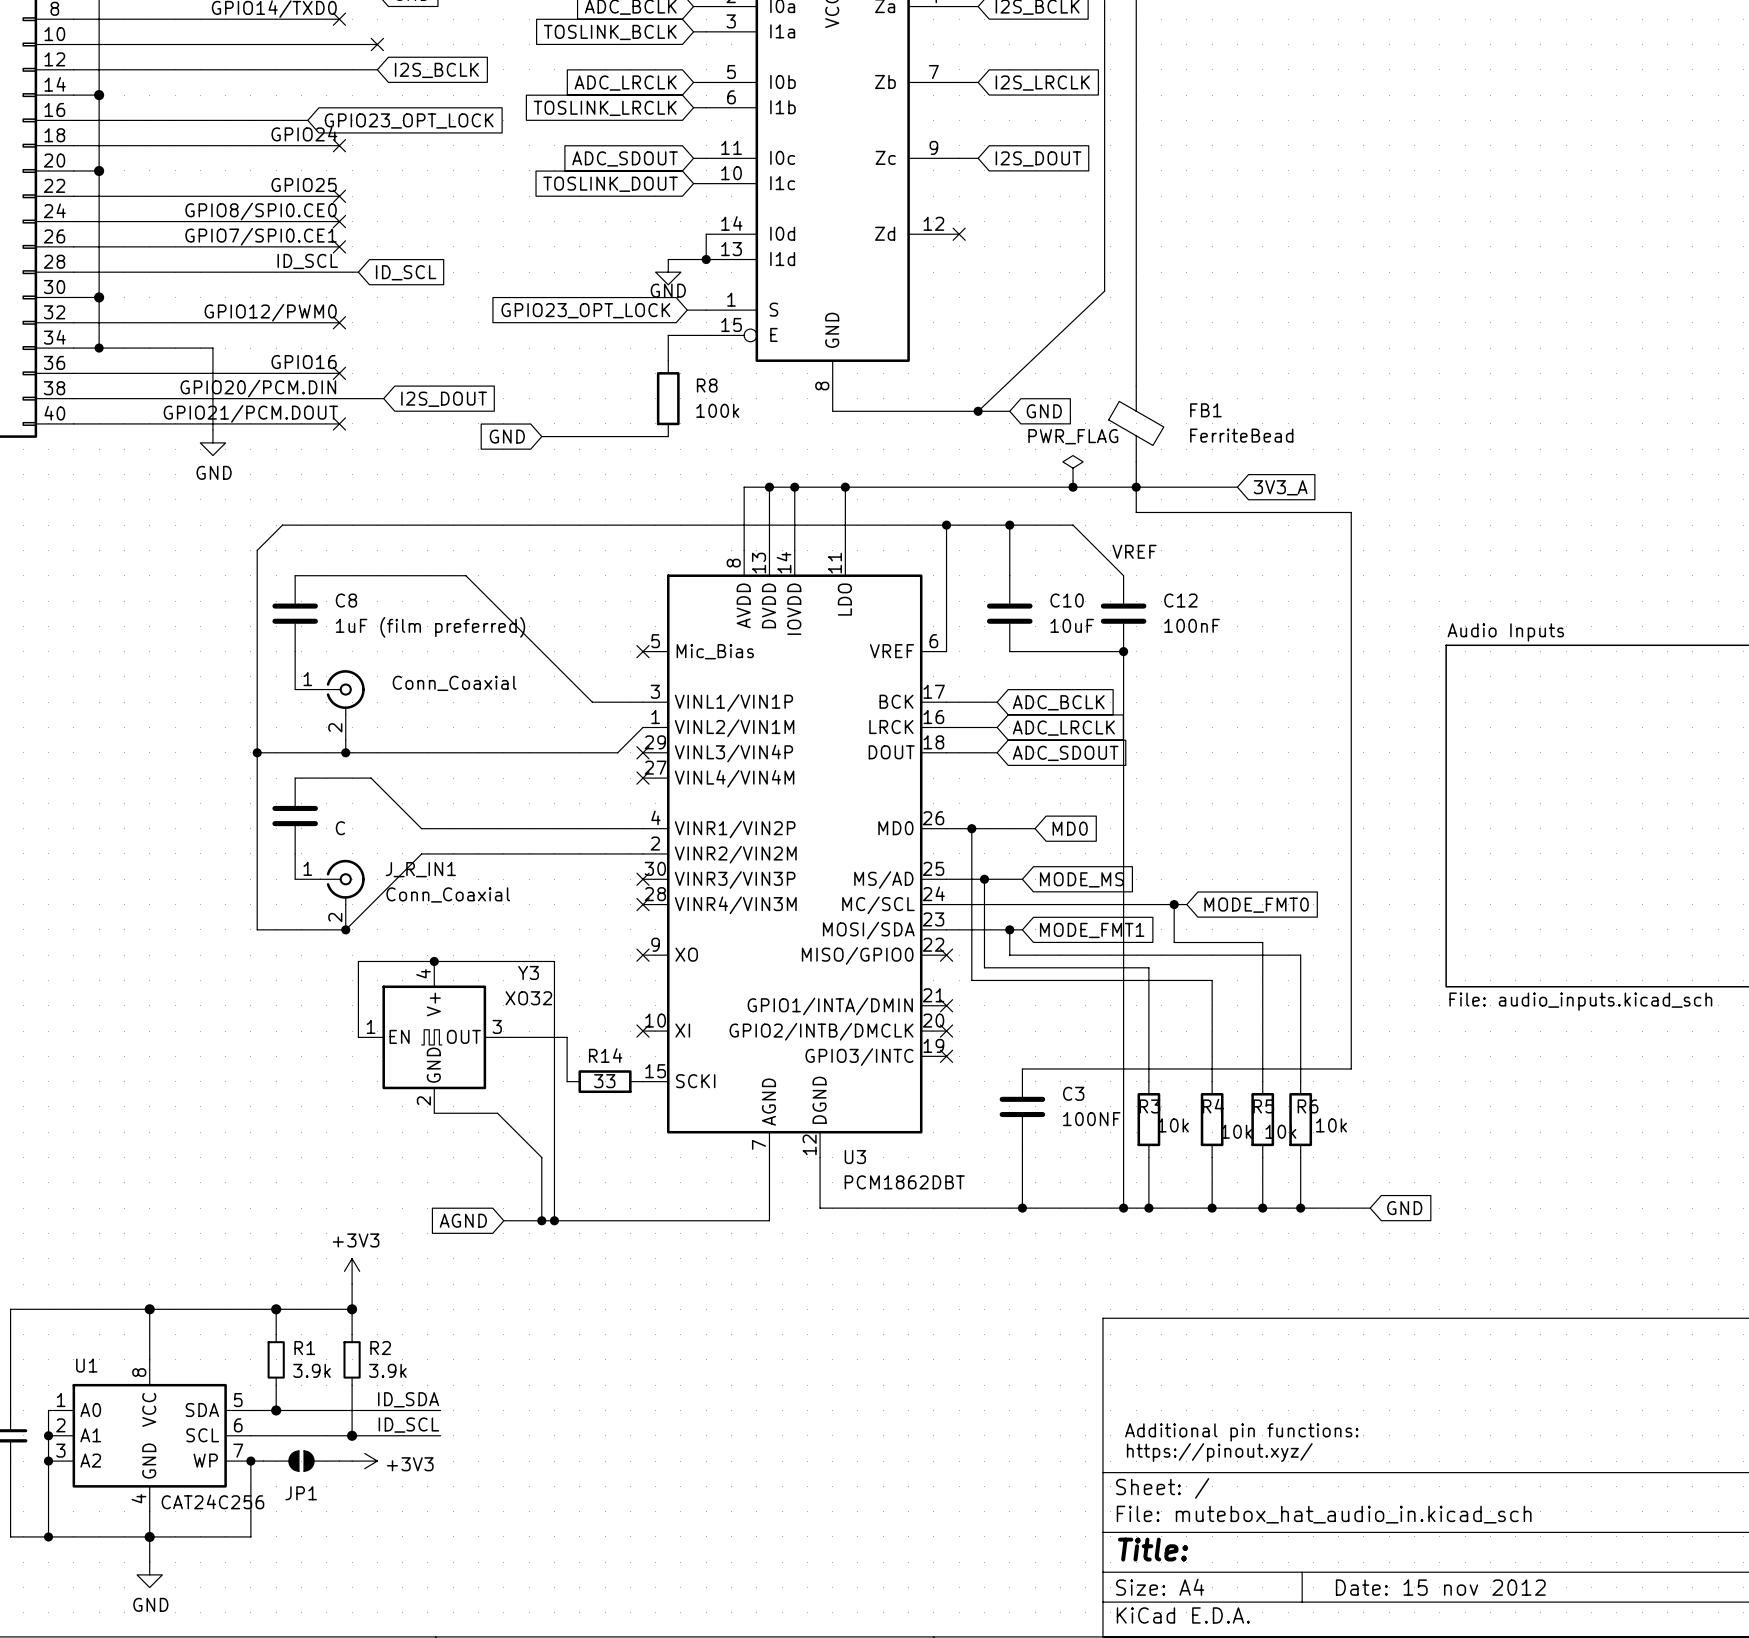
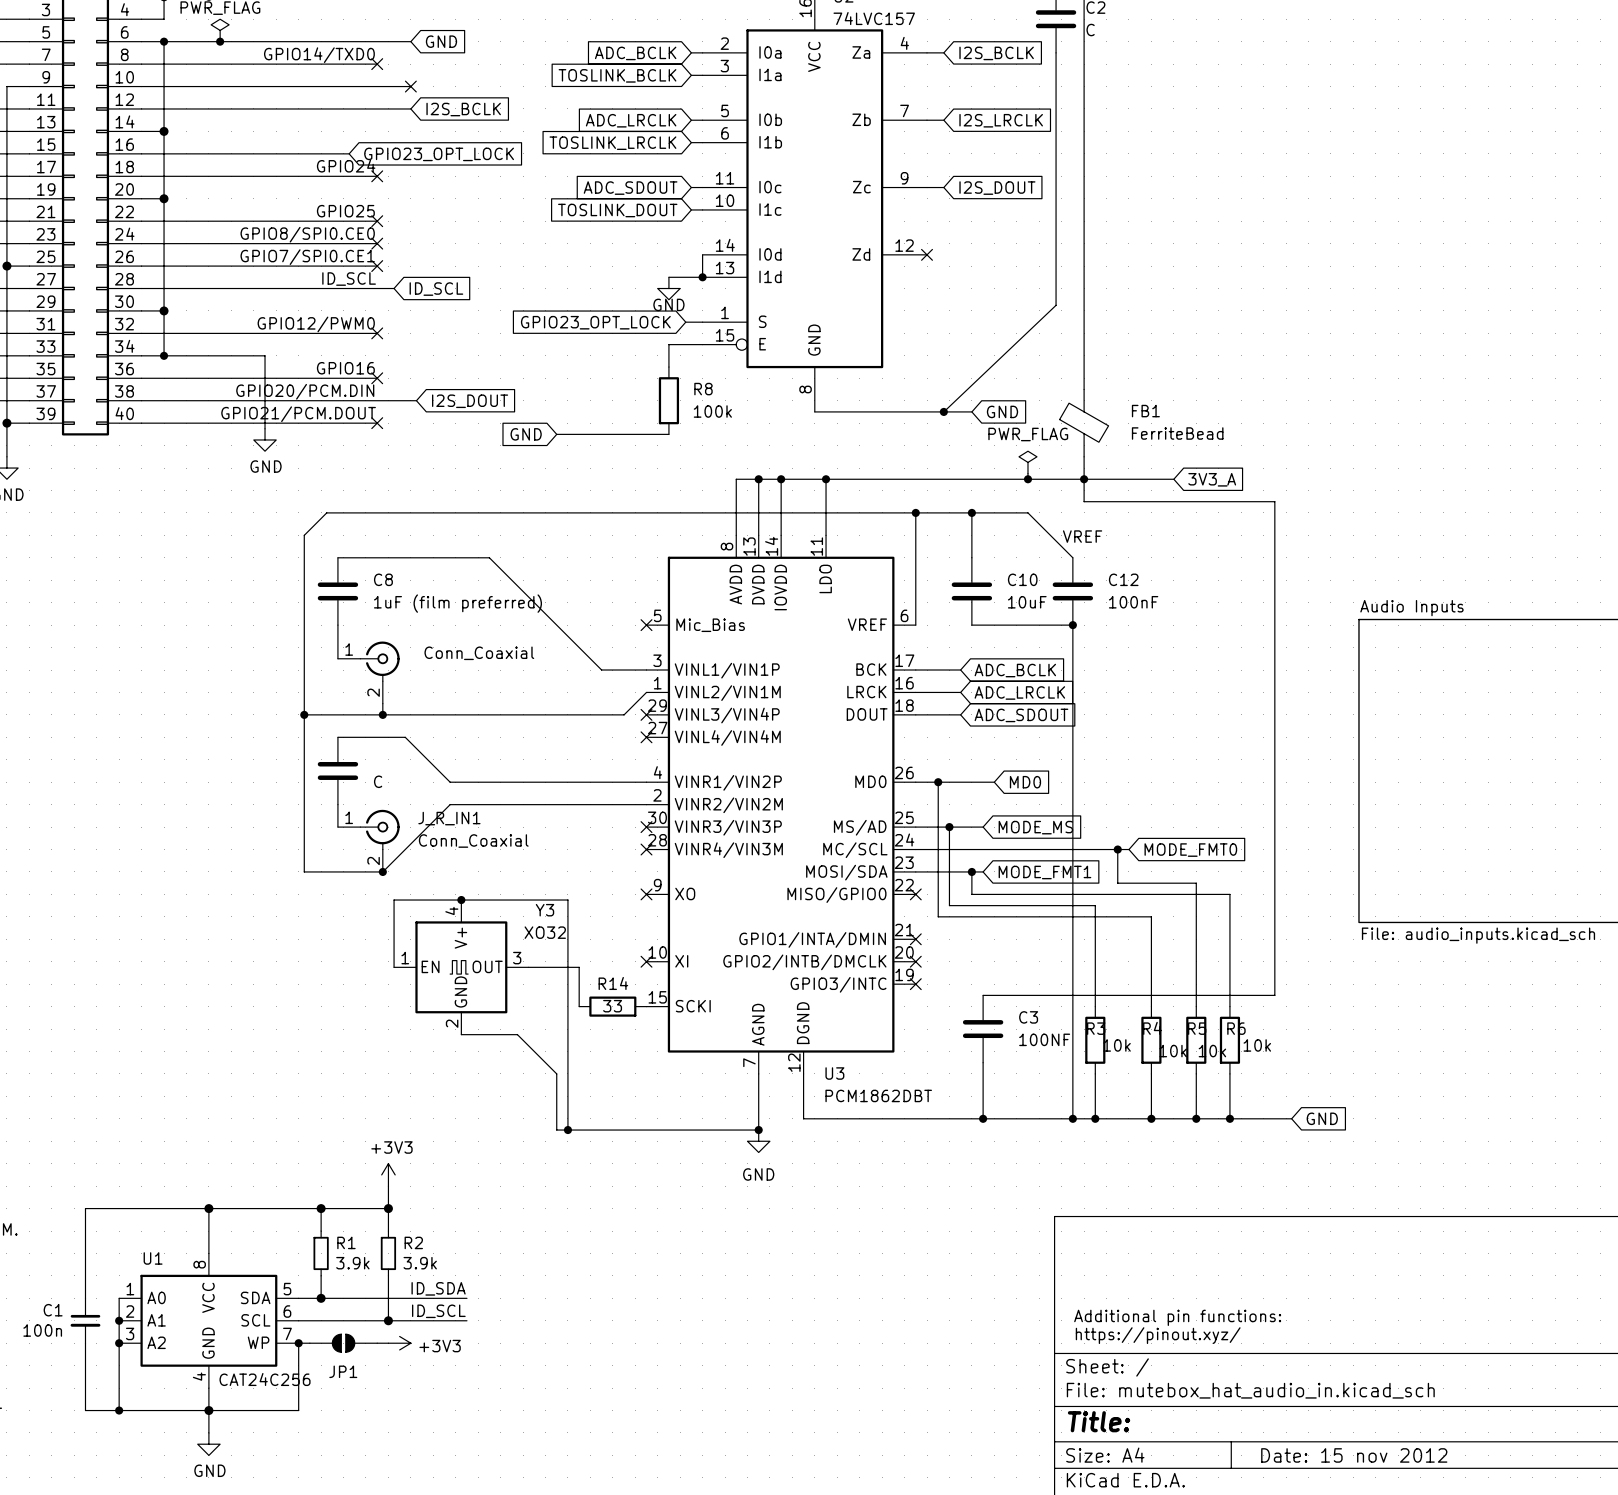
global label: AGND (463, 1220) -> none
wire: (503, 1220) (541, 1220) -> none
junction: (541, 1220) -> none
junction: none -> (758, 1130)
power symbol: none -> GND (758, 1141)

